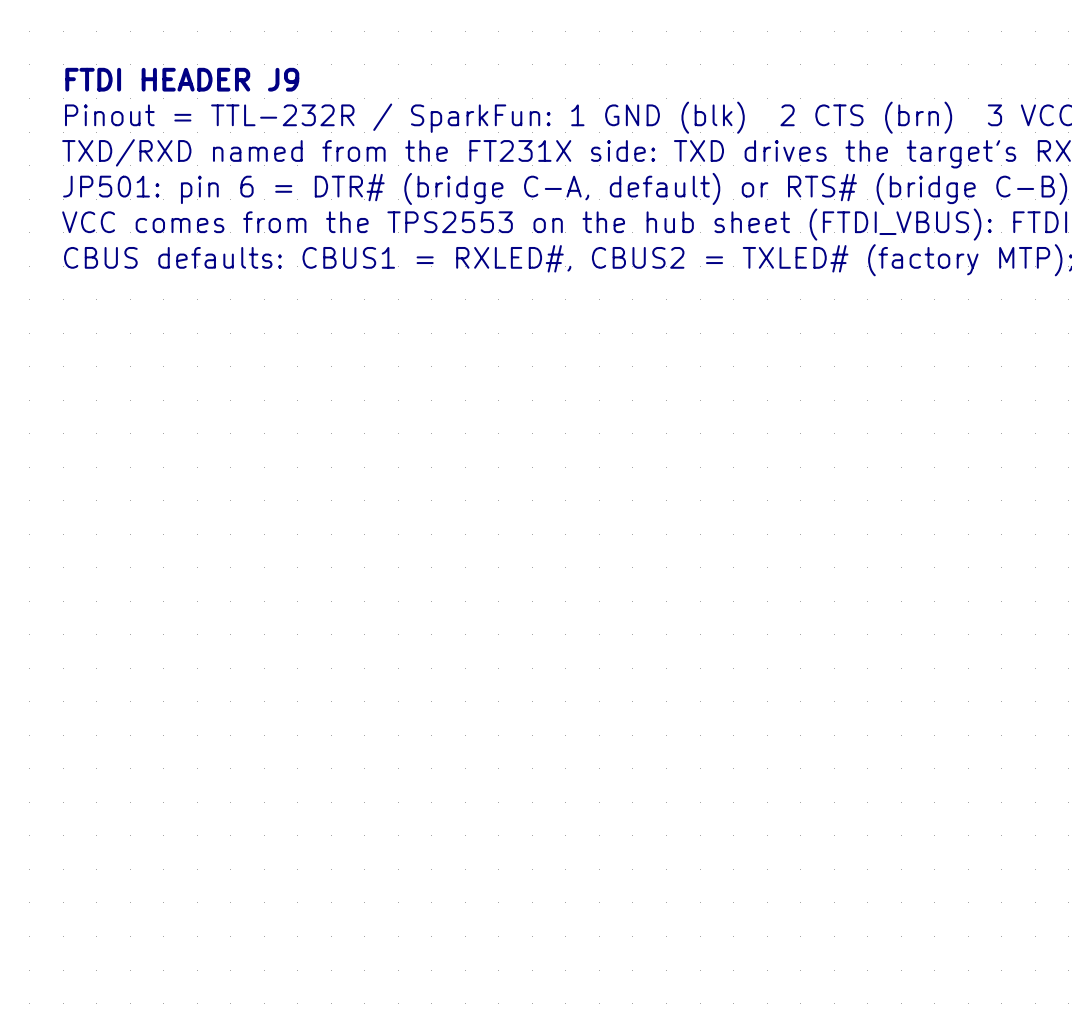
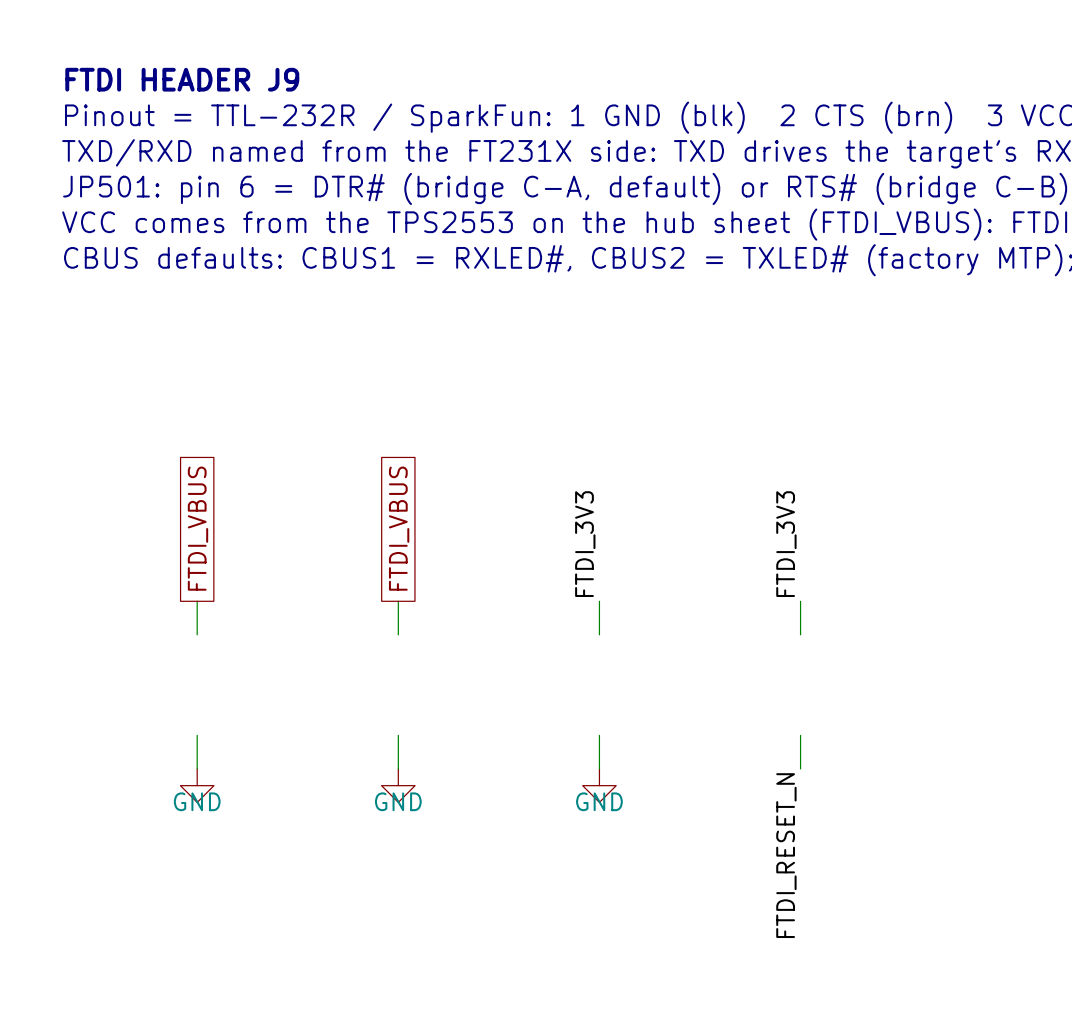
global label: none -> FTDI_VBUS (198, 528)
global label: none -> FTDI_VBUS (399, 528)
label: none -> FTDI_3V3 (585, 544)
label: none -> FTDI_3V3 (786, 544)
wire: none -> (197, 601) (197, 634)
wire: none -> (398, 601) (398, 634)
wire: none -> (599, 601) (599, 634)
wire: none -> (800, 601) (800, 634)
wire: none -> (197, 735) (197, 768)
wire: none -> (398, 735) (398, 768)
wire: none -> (599, 735) (599, 768)
wire: none -> (800, 735) (800, 768)
power symbol: none -> GND (197, 785)
power symbol: none -> GND (398, 785)
power symbol: none -> GND (599, 785)
label: none -> FTDI_RESET_N (786, 855)

